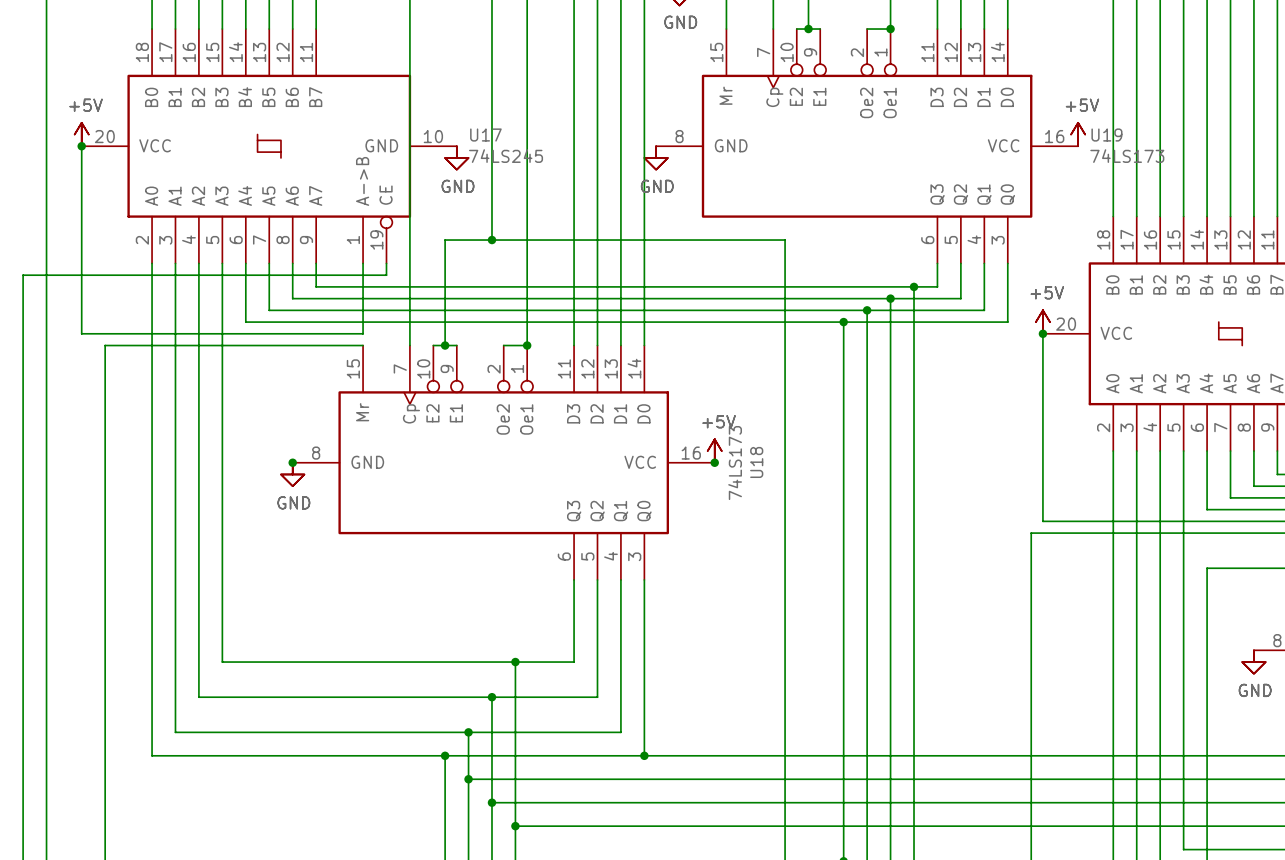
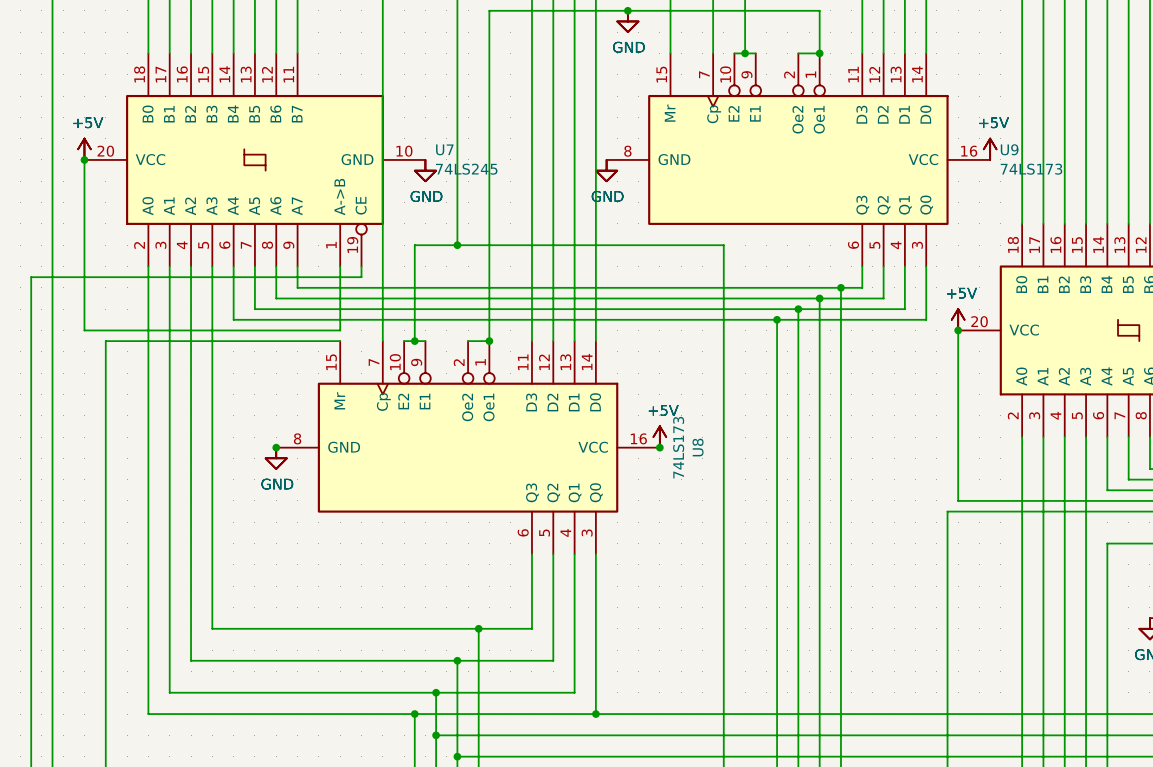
U17 name: U17 (485, 135) -> U7 (444, 149)
U19 name: U19 (1106, 135) -> U9 (1009, 149)
U18 name: U18 (756, 462) -> U8 (698, 447)

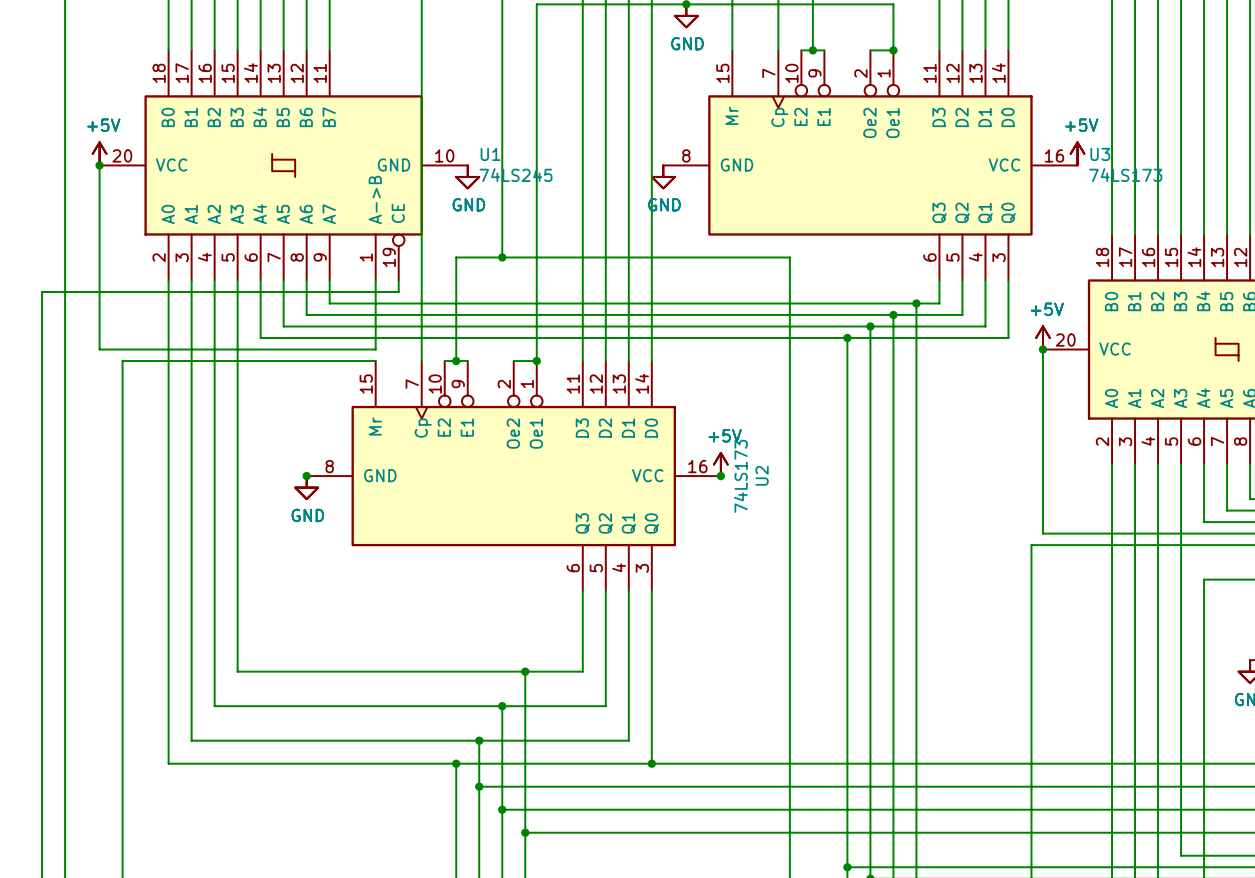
U7 name: U7 (444, 149) -> U1 (490, 154)
U9 name: U9 (1009, 149) -> U3 (1100, 154)
U8 name: U8 (698, 447) -> U2 (762, 475)

